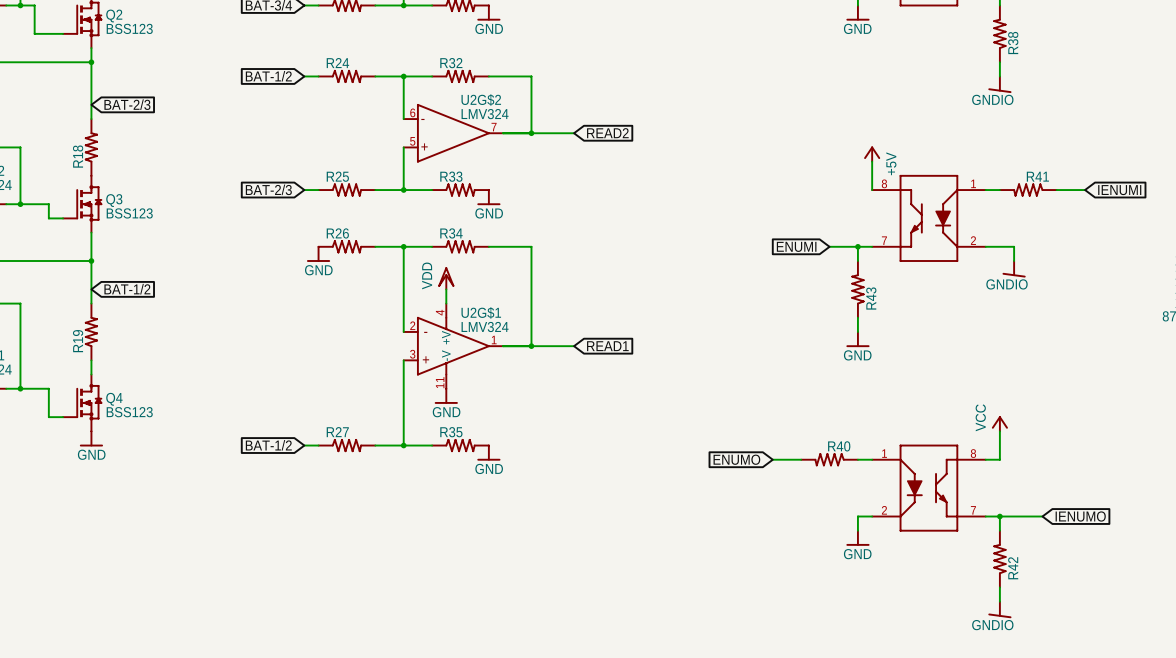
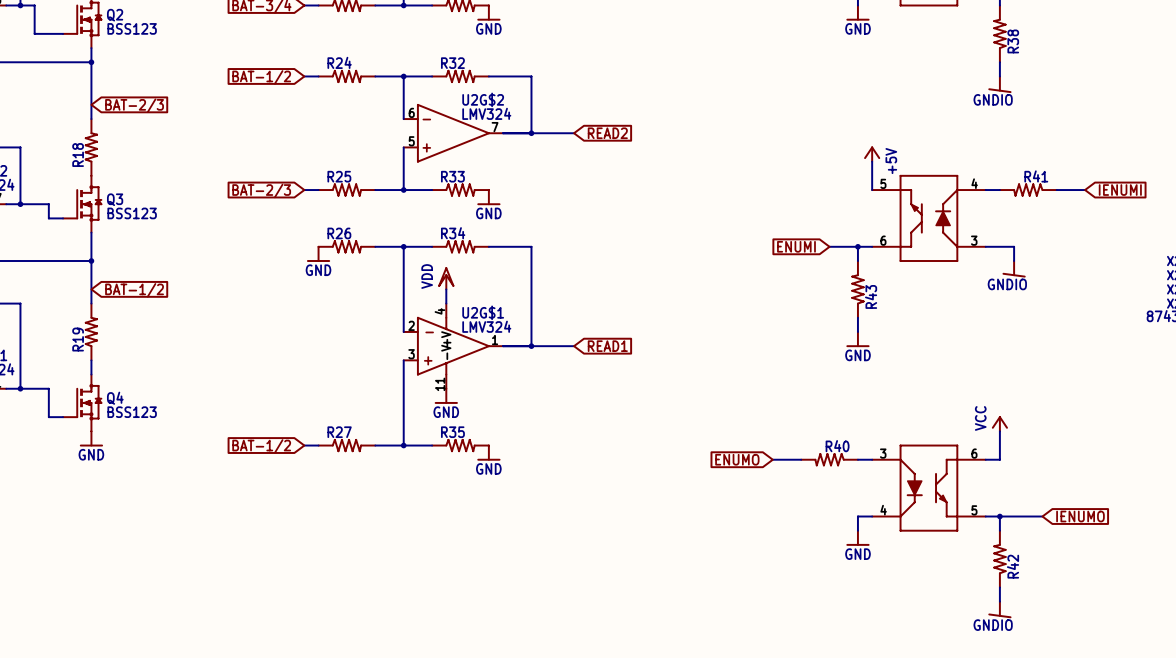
part symbol: [872, 175, 986, 262] -> [872, 175, 986, 262]
part pin number: 1 (884, 453) -> 3 (883, 453)
part pin number: 8 (973, 453) -> 6 (974, 453)
part pin number: 2 (884, 510) -> 4 (883, 510)
part pin number: 7 (973, 510) -> 5 (974, 510)

